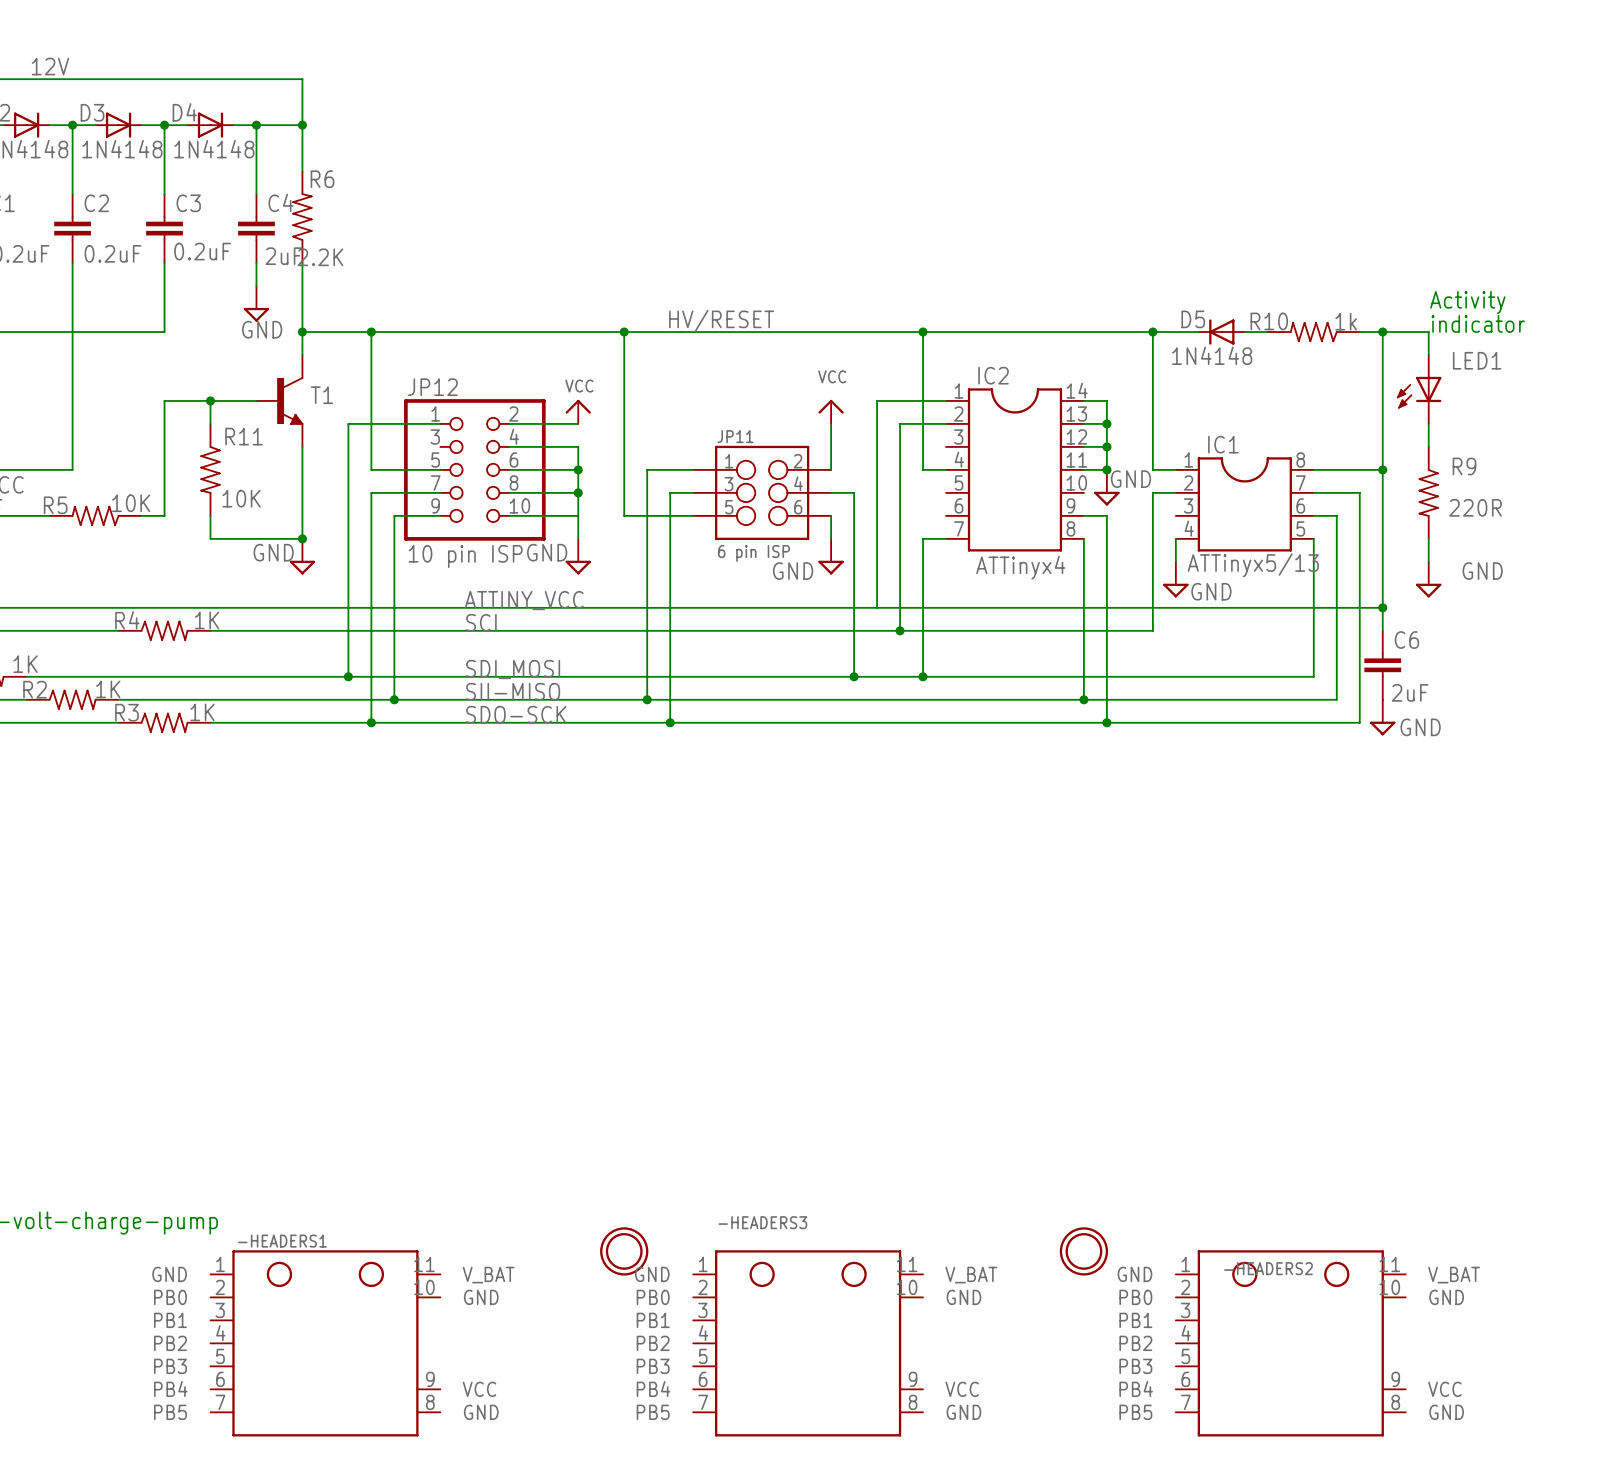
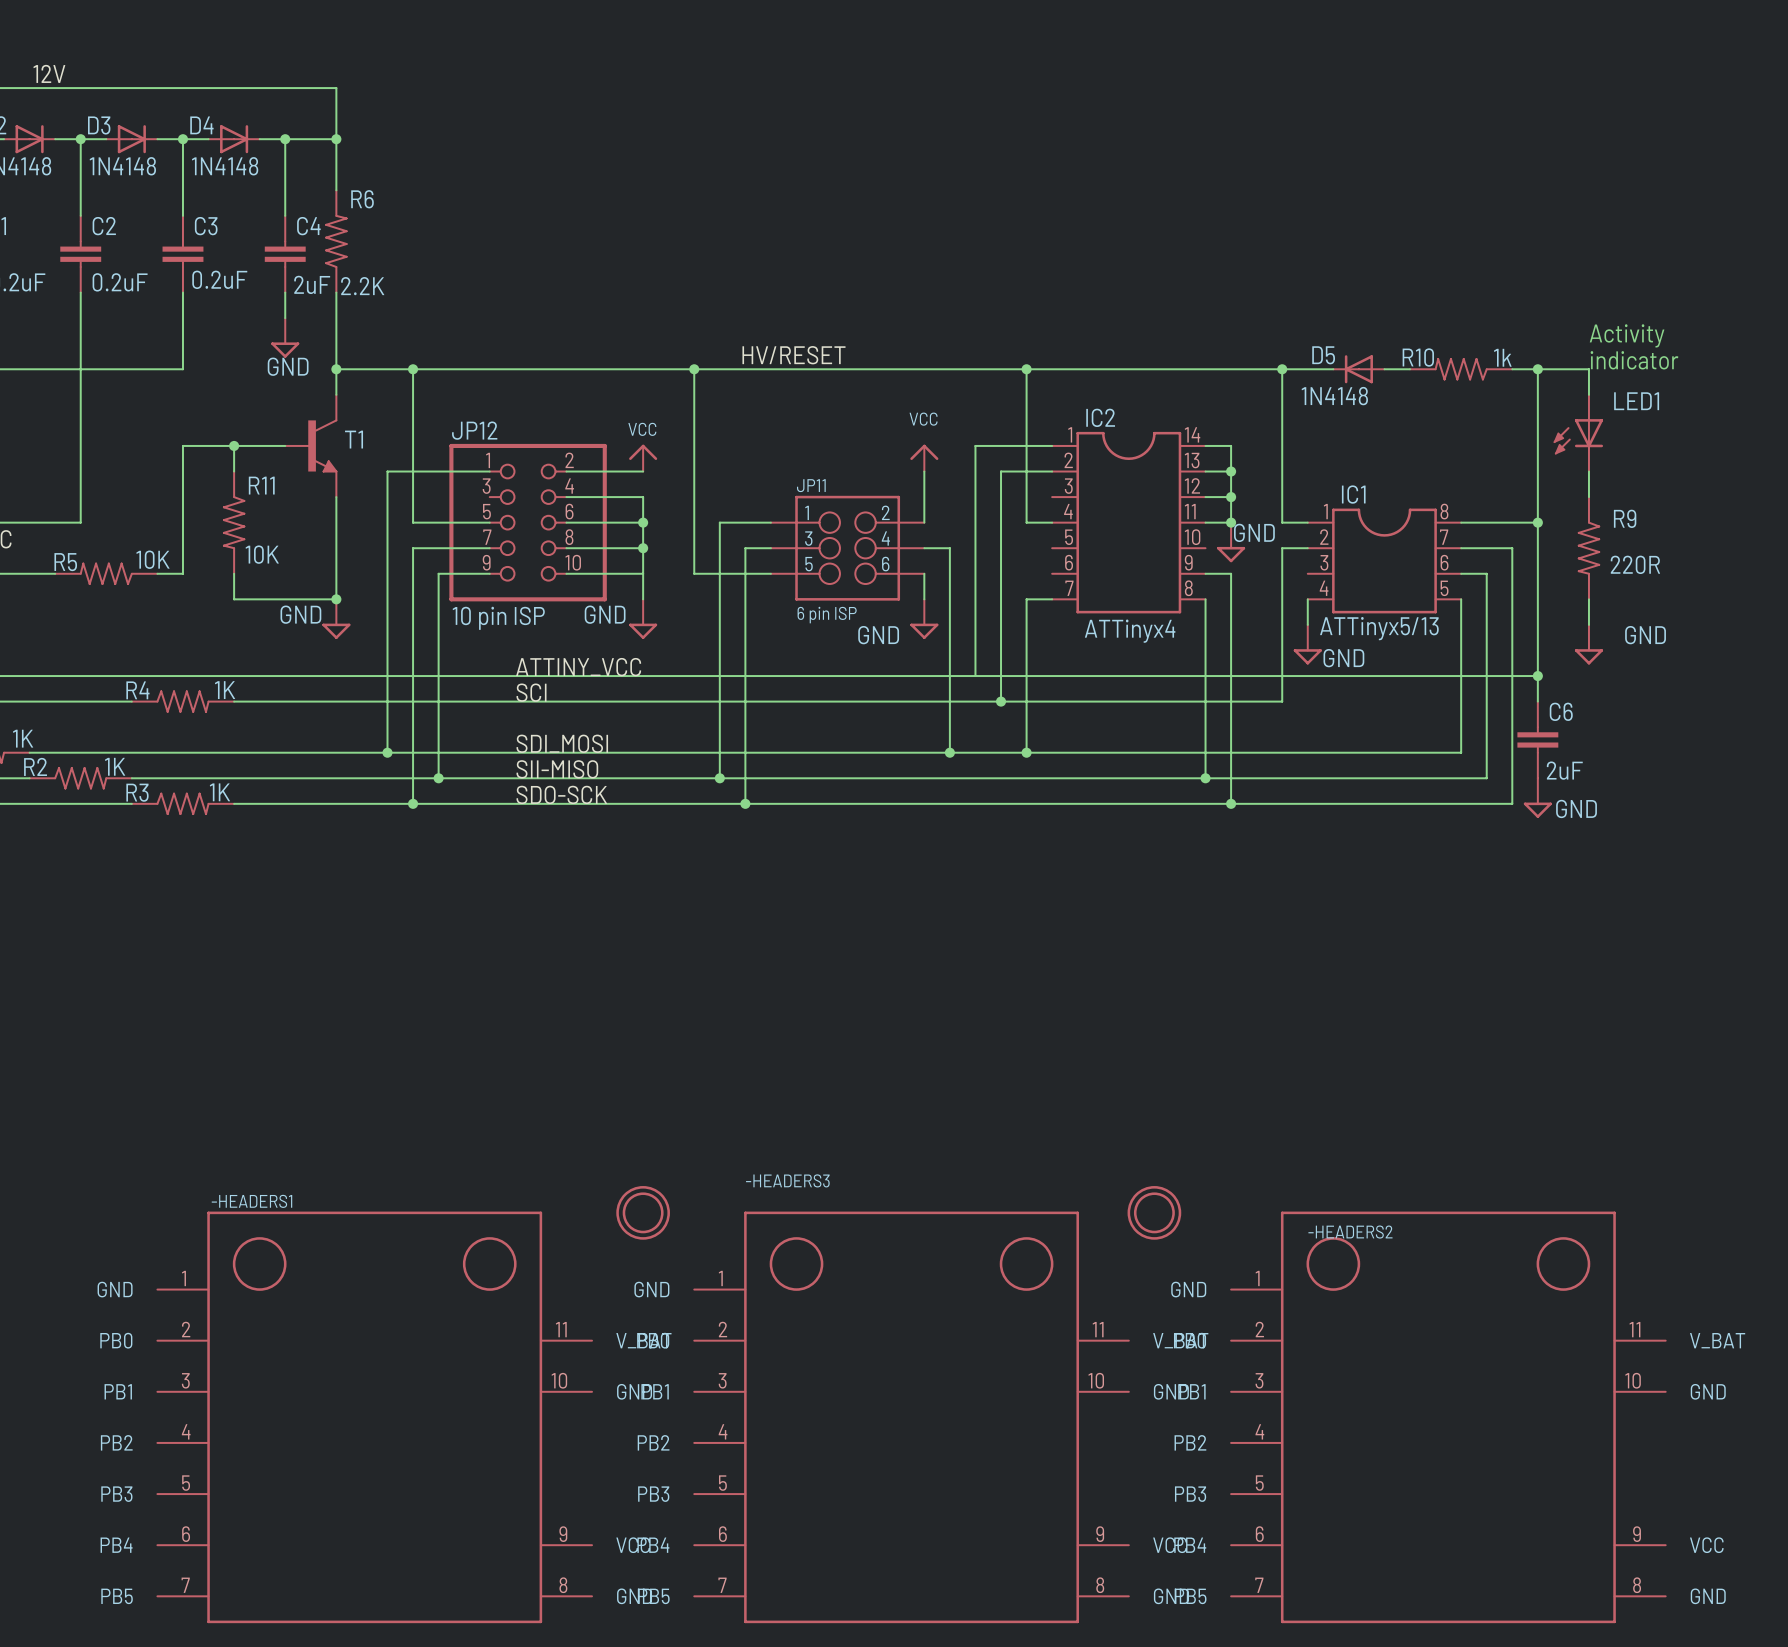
-HEADERS3 name position: -HEADERS3 (762, 1222) -> -HEADERS3 (787, 1180)
-HEADERS1 name position: -HEADERS1 (282, 1241) -> -HEADERS1 (251, 1201)
-HEADERS1 symbol: [210, 1250, 441, 1437] -> [157, 1211, 593, 1624]
-HEADERS3 symbol: [693, 1250, 924, 1437] -> [694, 1211, 1129, 1624]
-HEADERS2 symbol: [1175, 1250, 1406, 1437] -> [1231, 1211, 1666, 1624]
part position: (624, 1251) -> (643, 1212)
part position: (1083, 1251) -> (1154, 1212)
-HEADERS2 name position: -HEADERS2 (1268, 1268) -> -HEADERS2 (1350, 1232)

